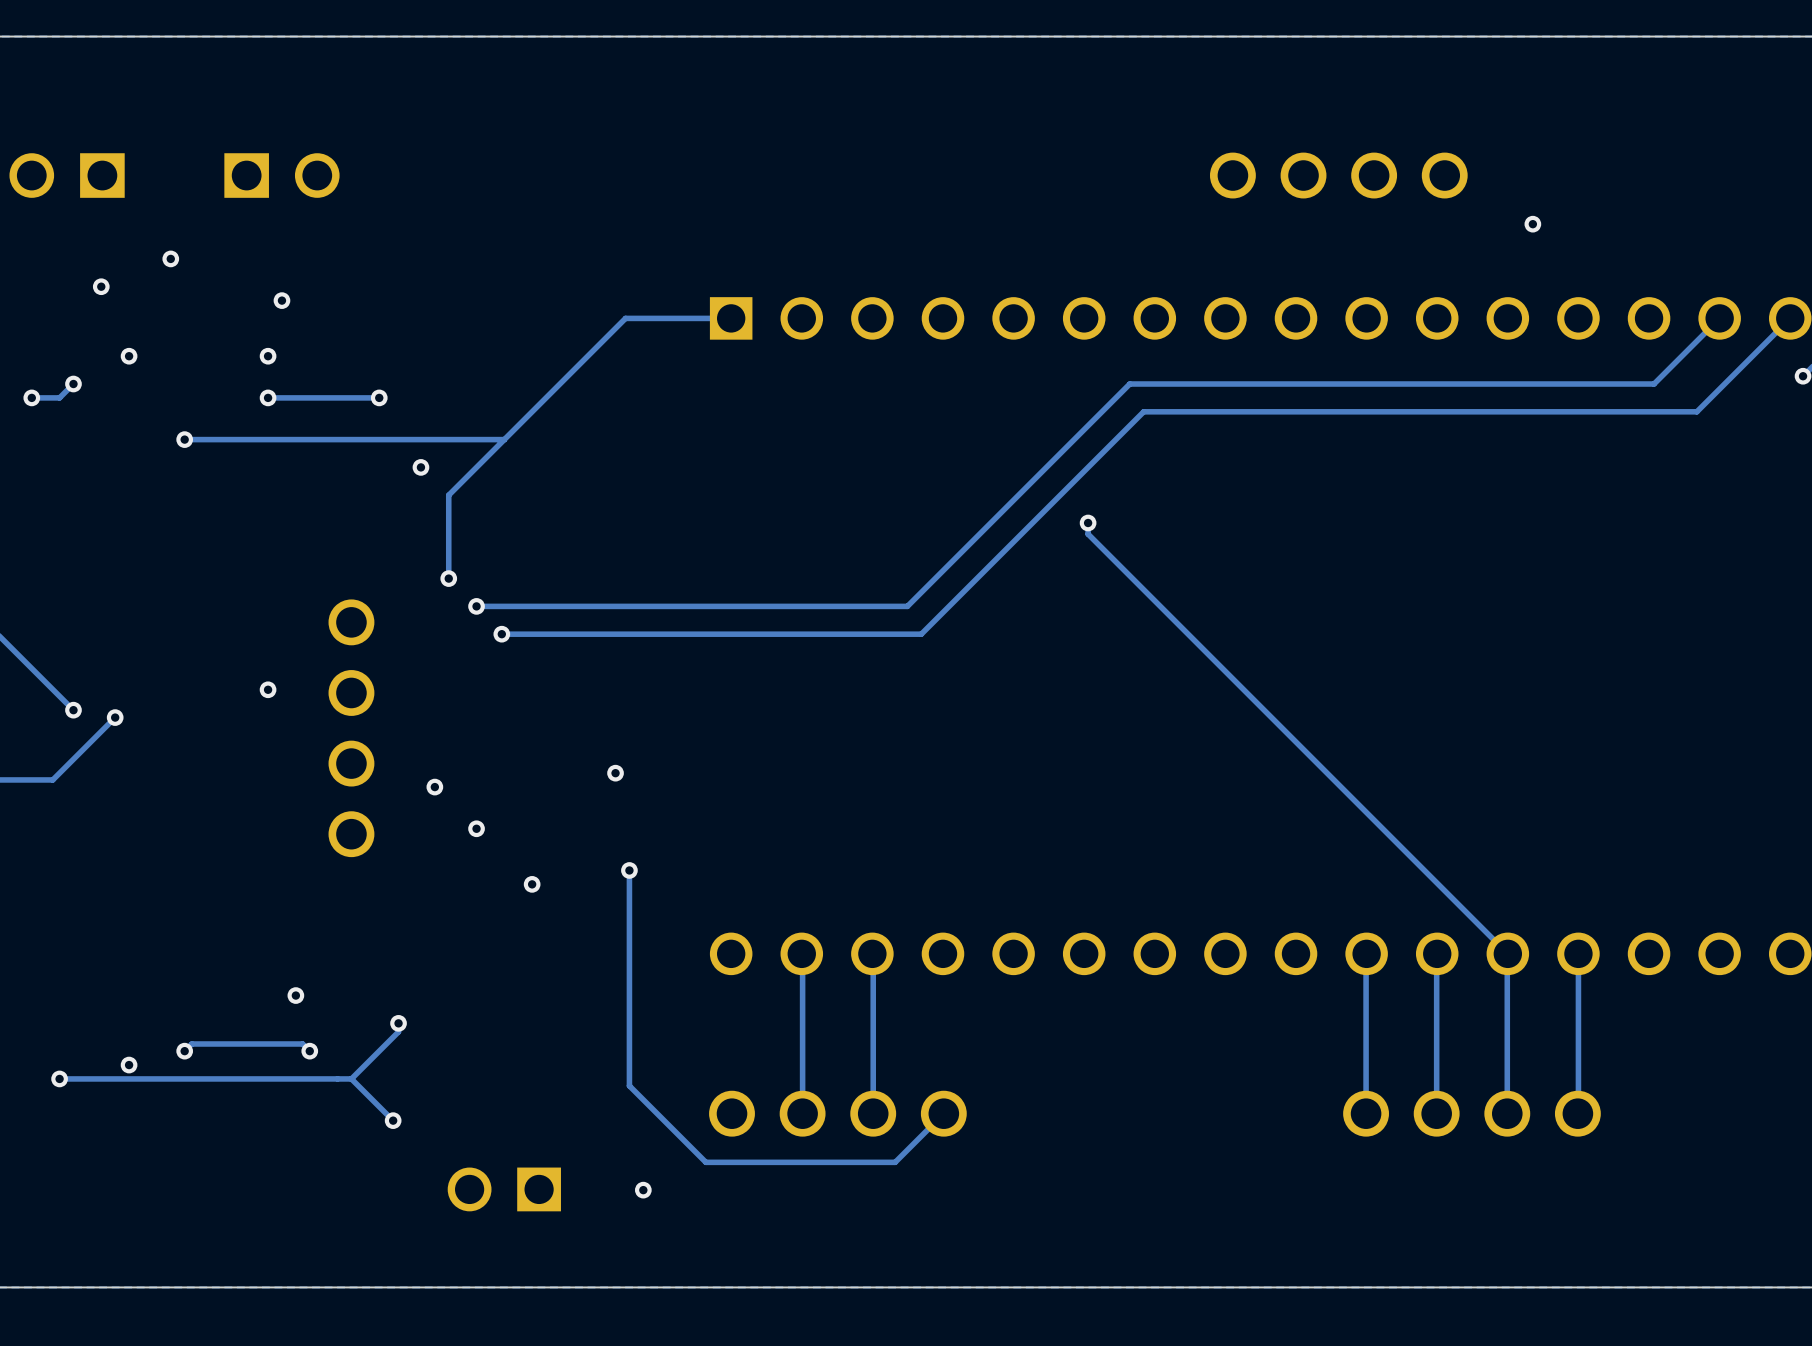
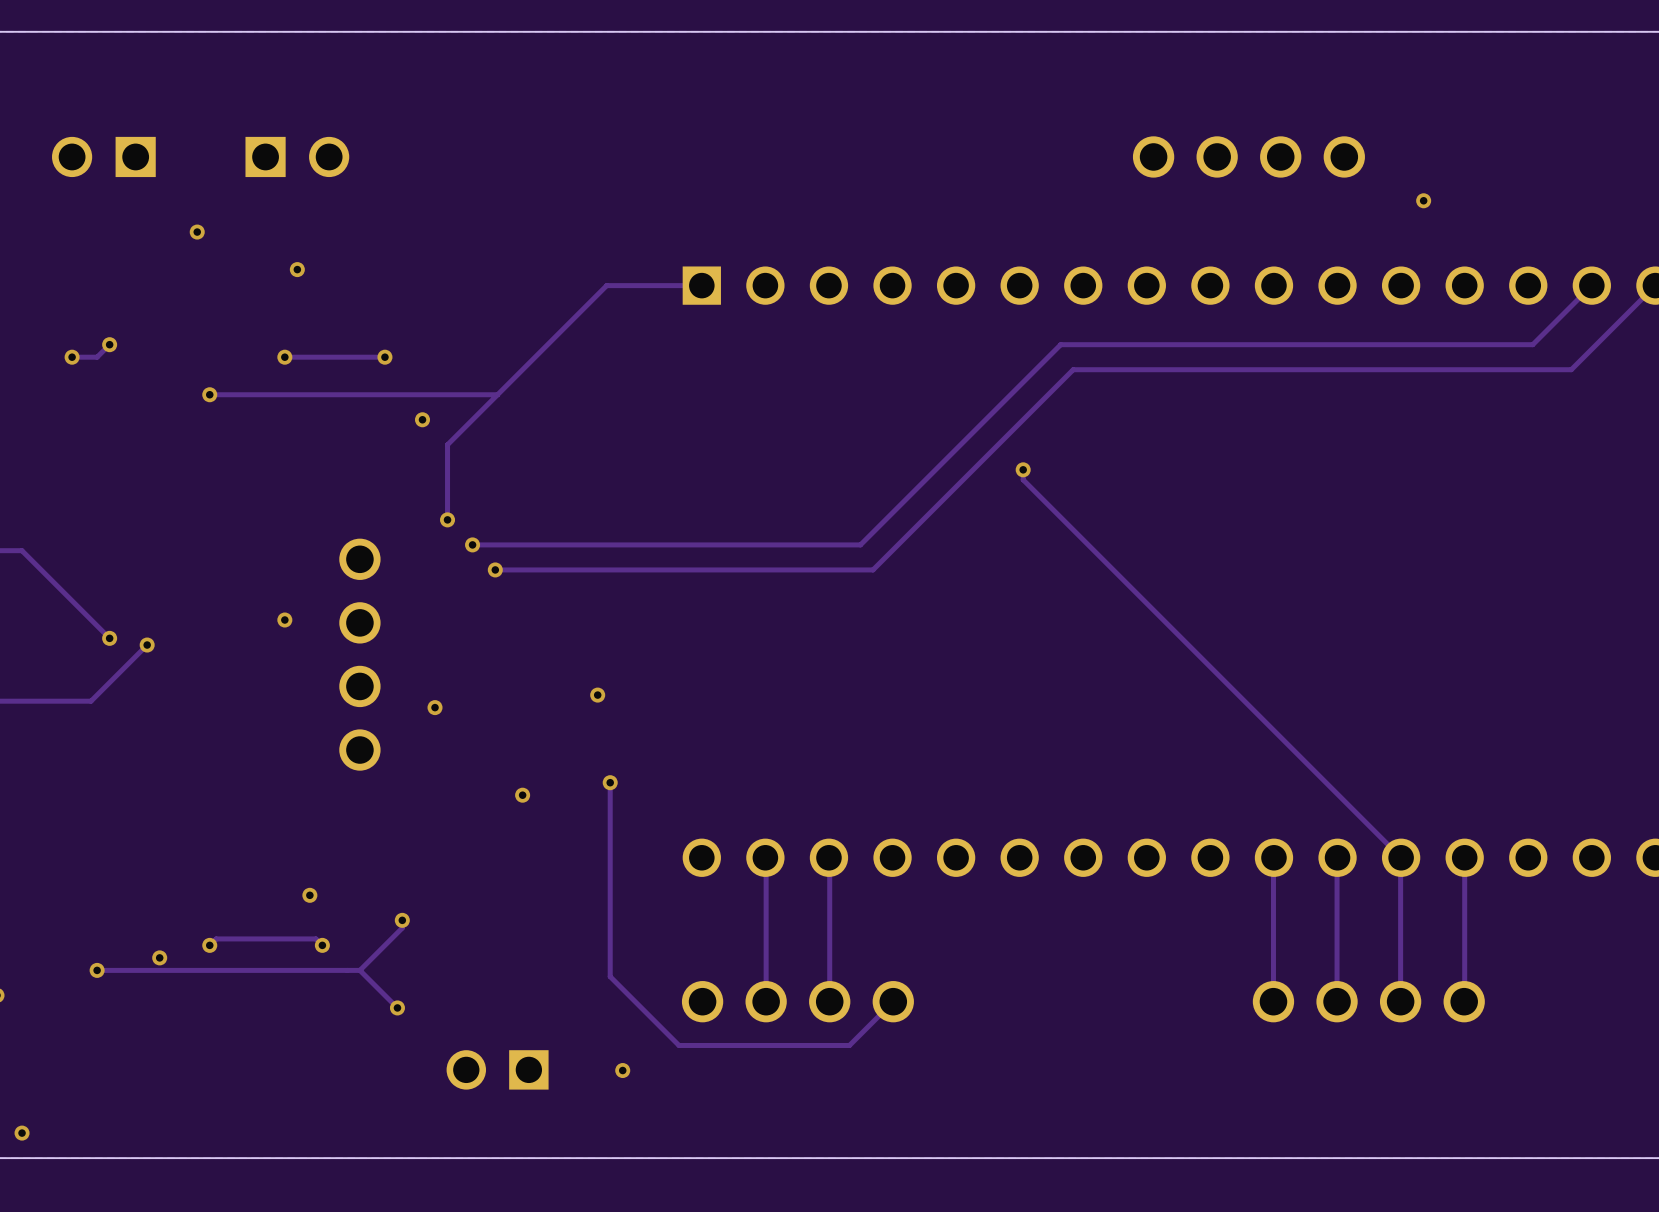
via: (101, 286) -> none
via: (129, 356) -> none
via: (268, 356) -> none
via: (476, 828) -> none

